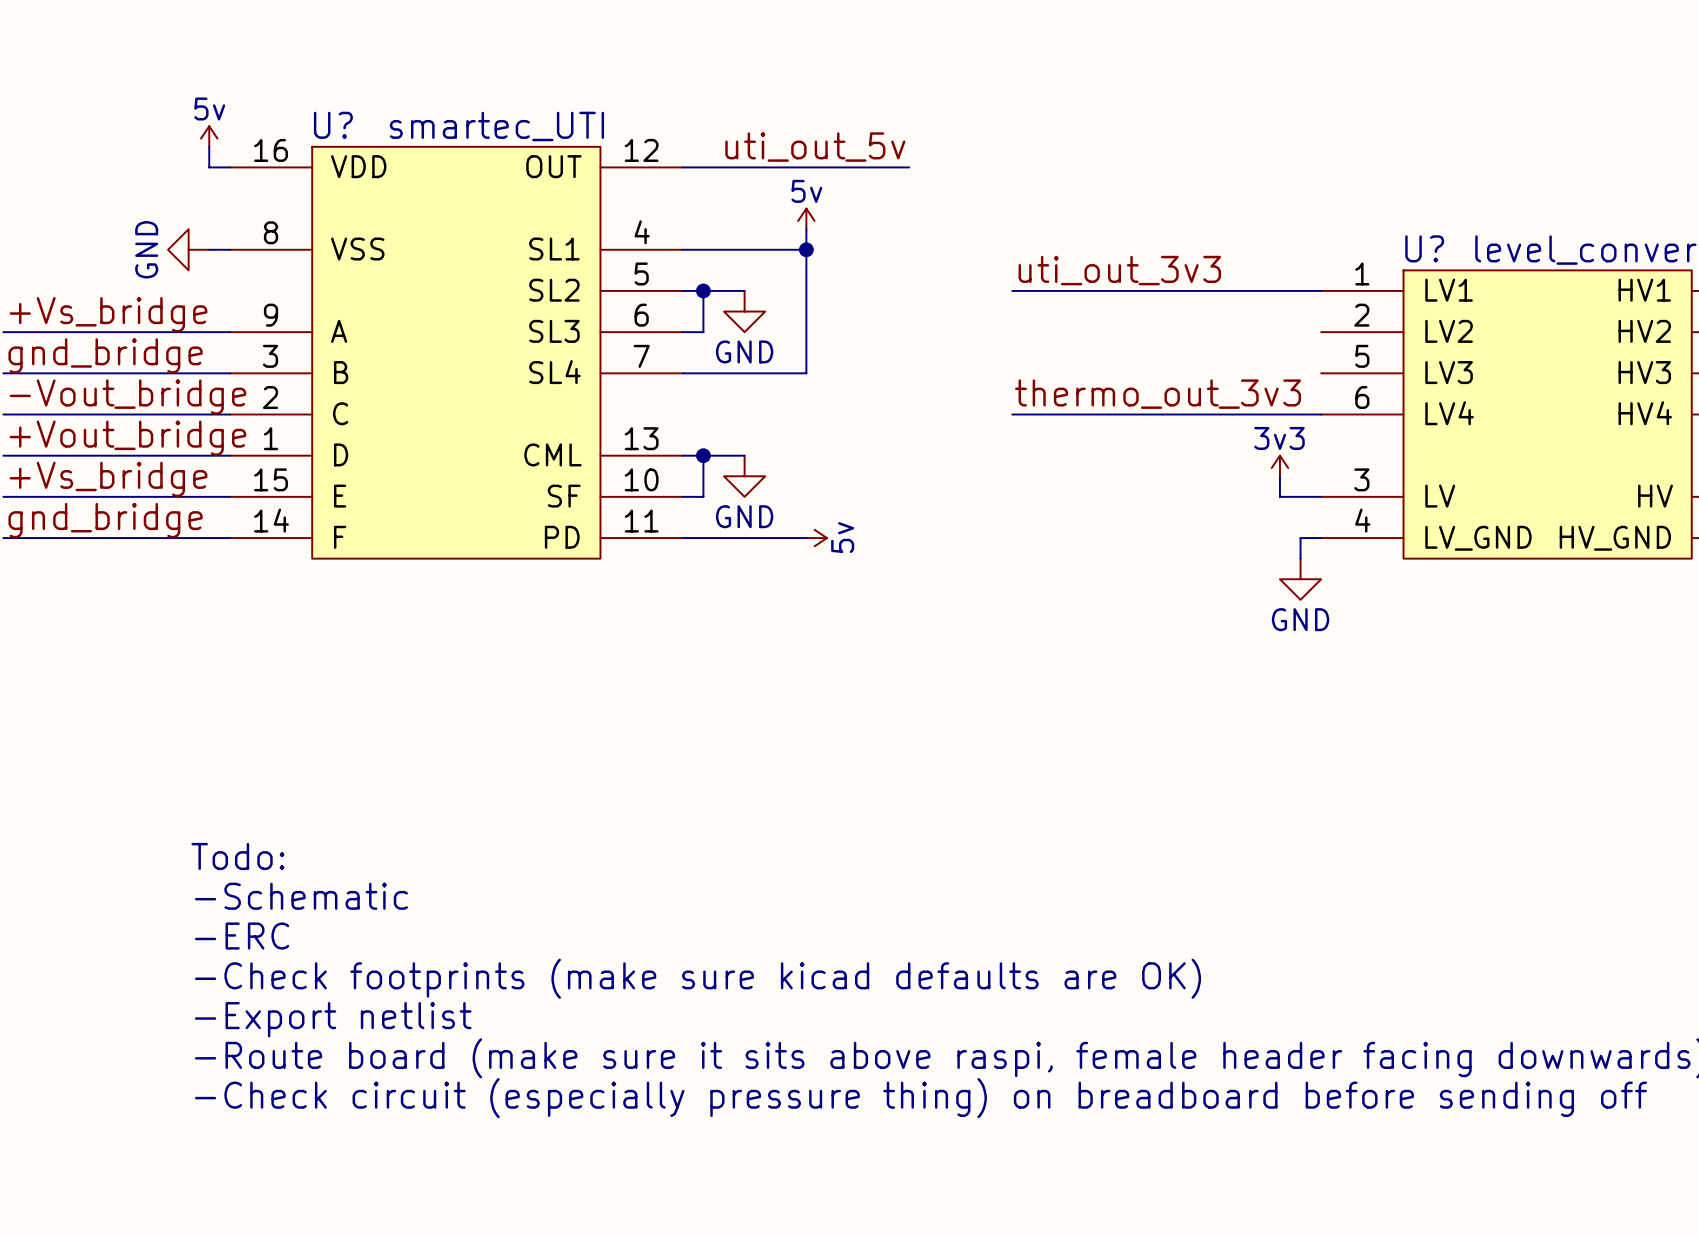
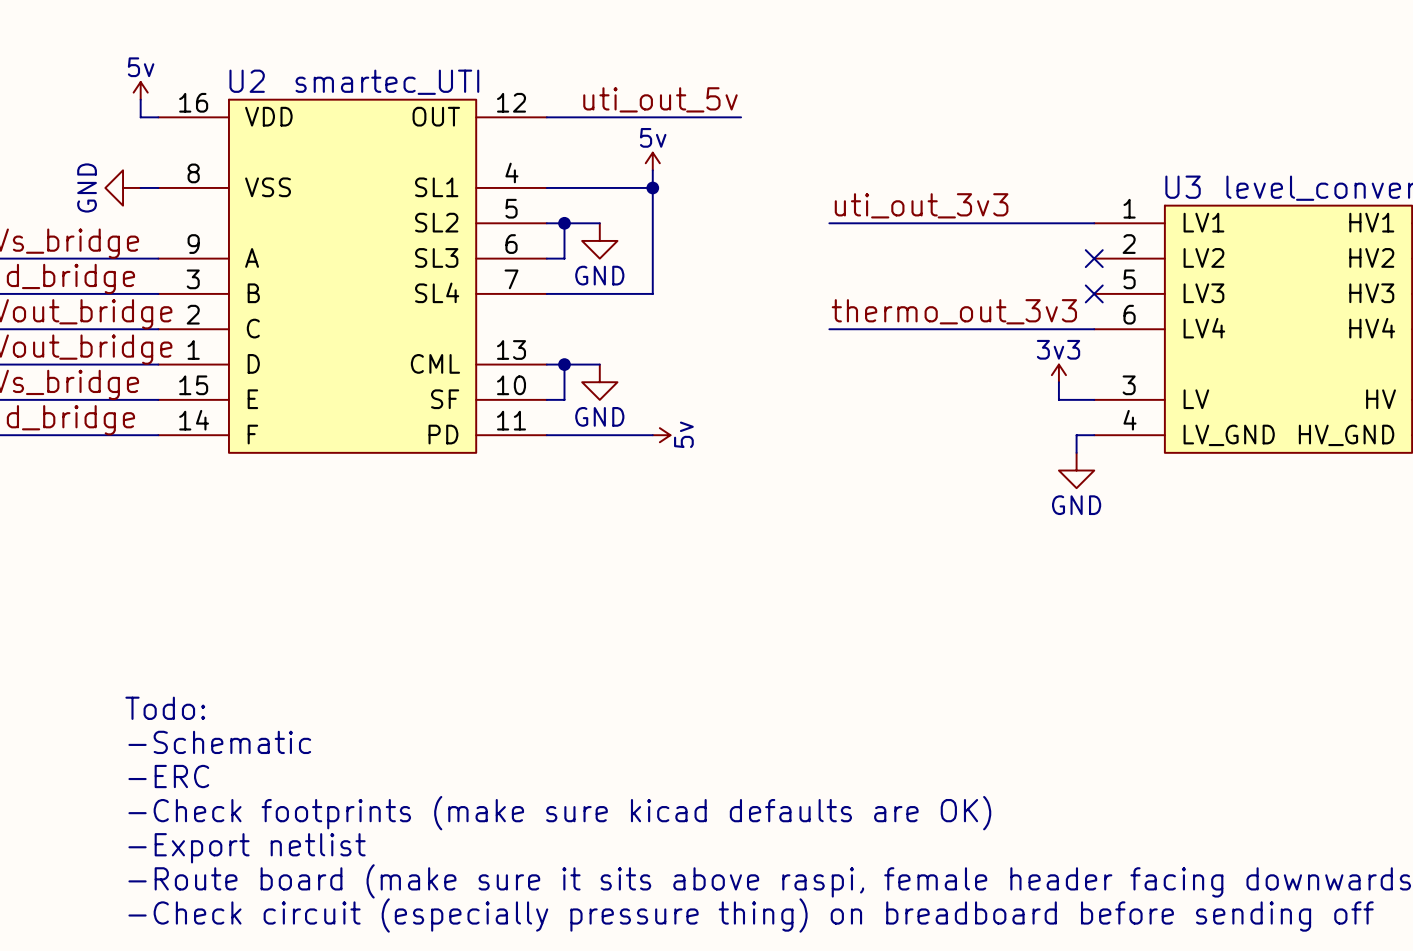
U? name: U? (333, 125) -> U2 (247, 81)
U? name: U? (1424, 248) -> U3 (1183, 187)
no-connect mark: none -> (1094, 258)
no-connect mark: none -> (1094, 293)

